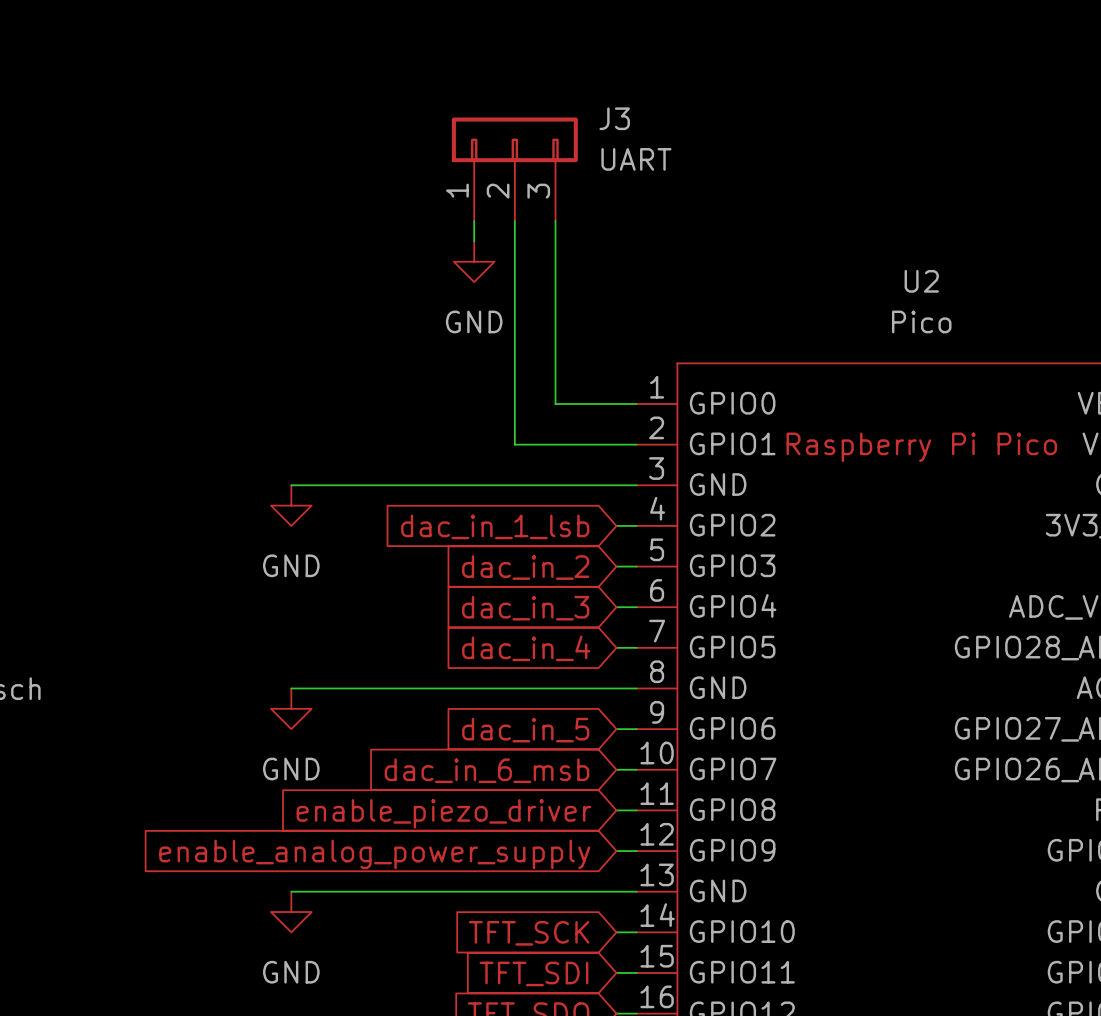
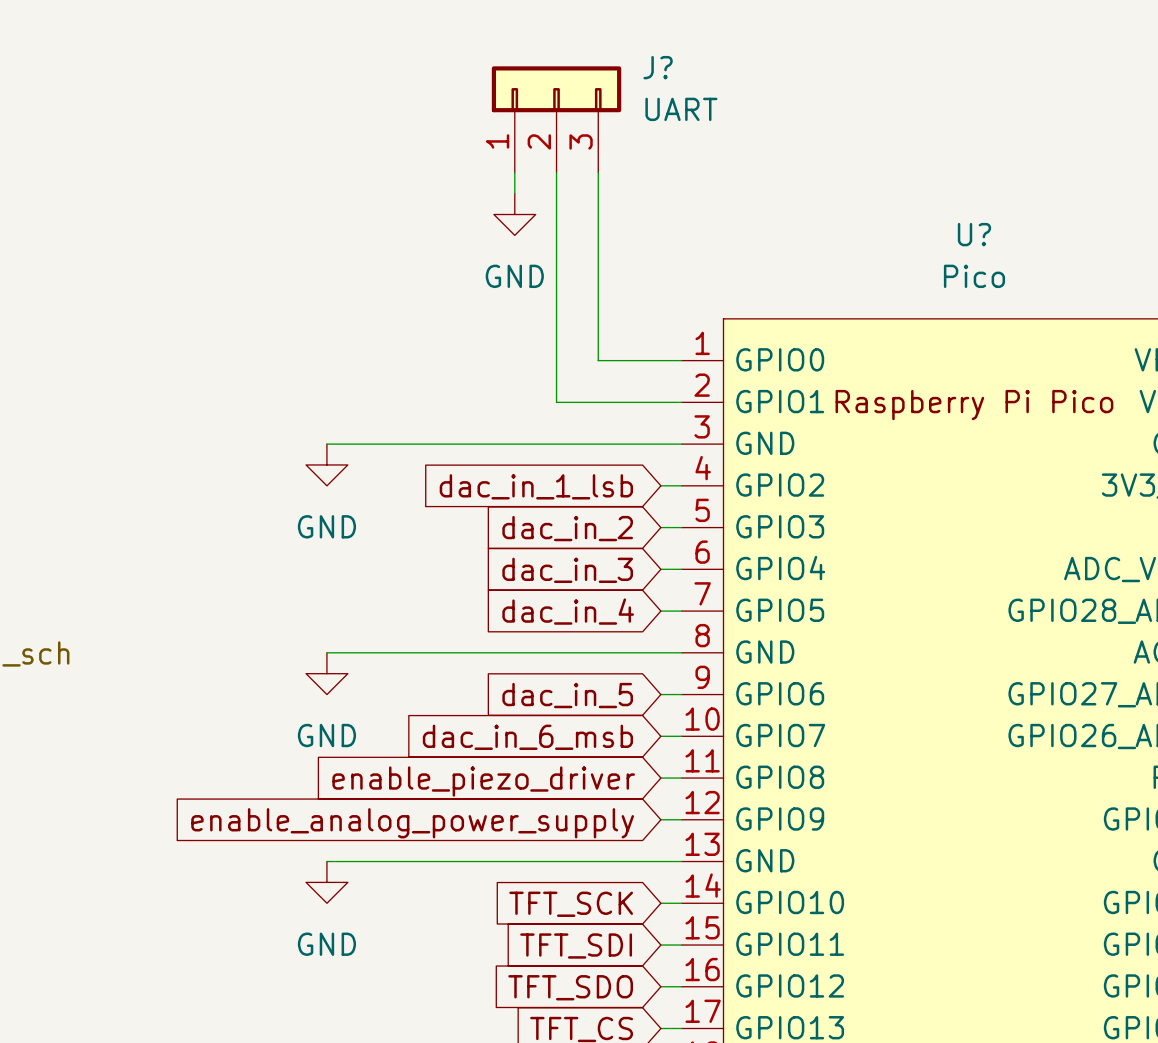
J3 name: J3 (614, 118) -> J? (658, 67)
U2 name: U2 (921, 281) -> U? (974, 234)

